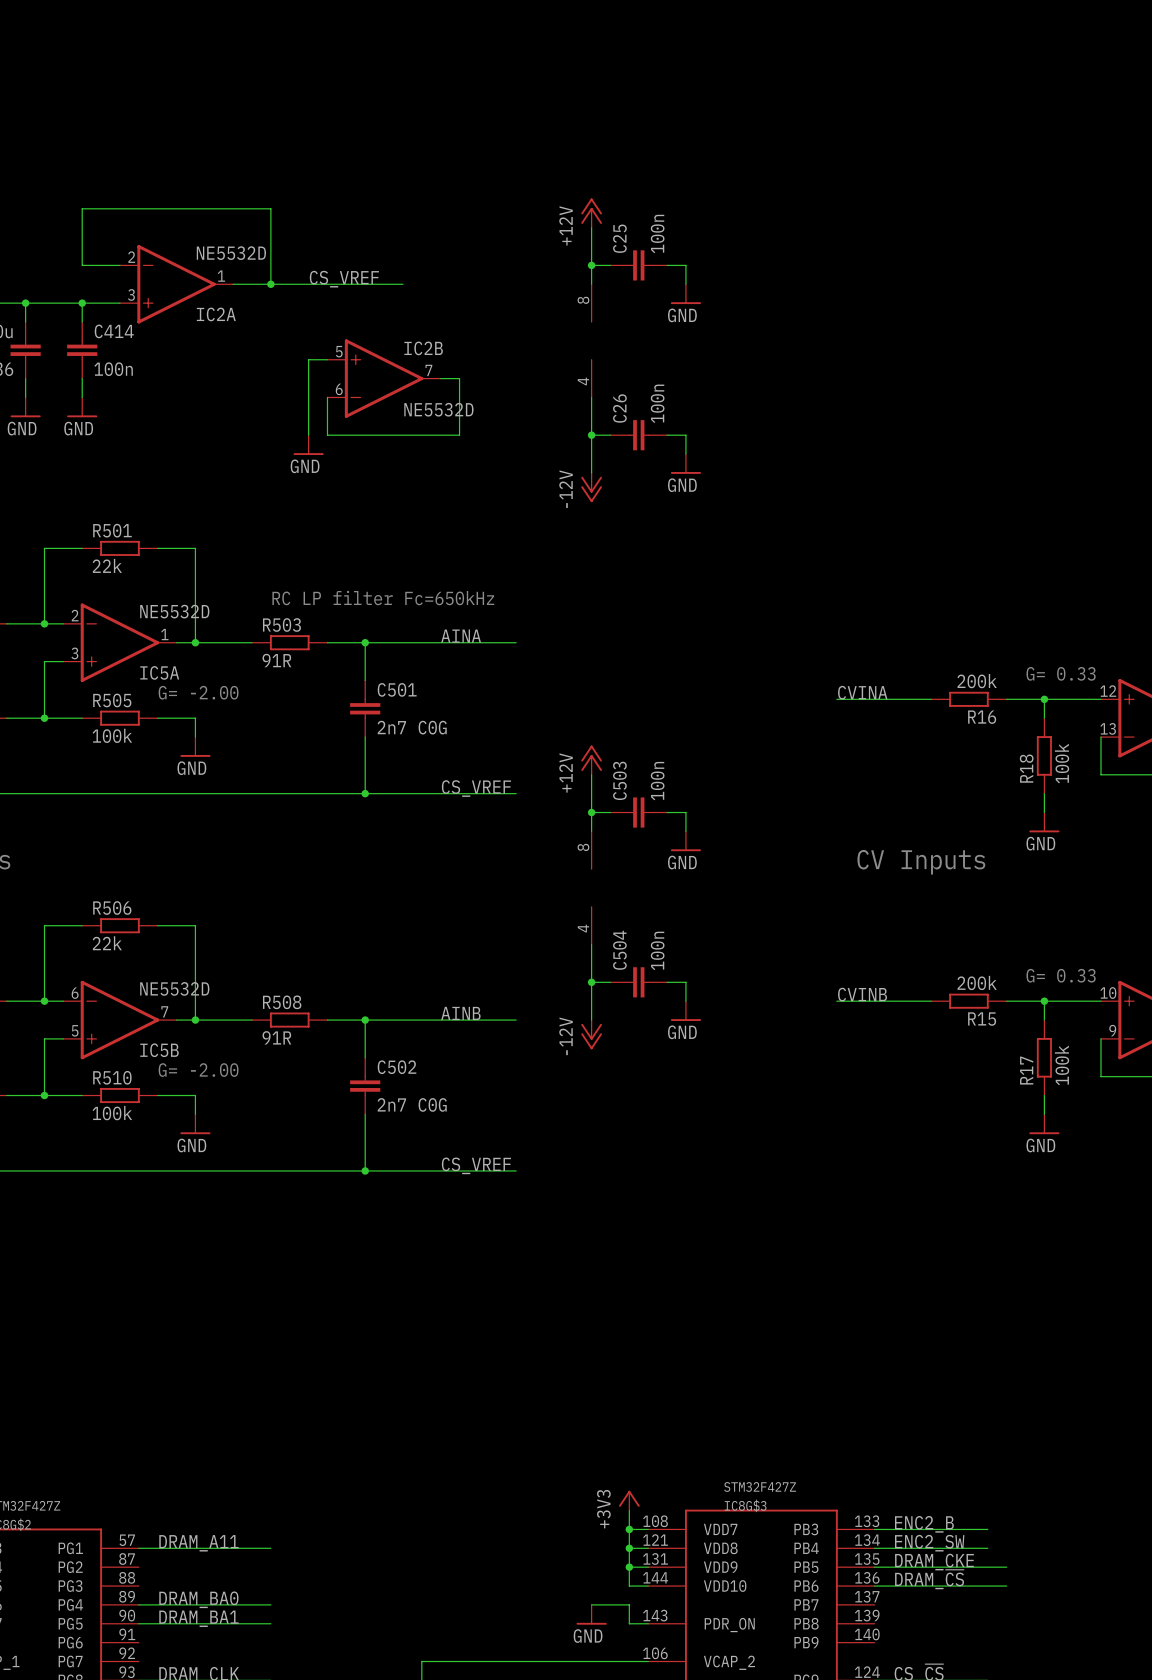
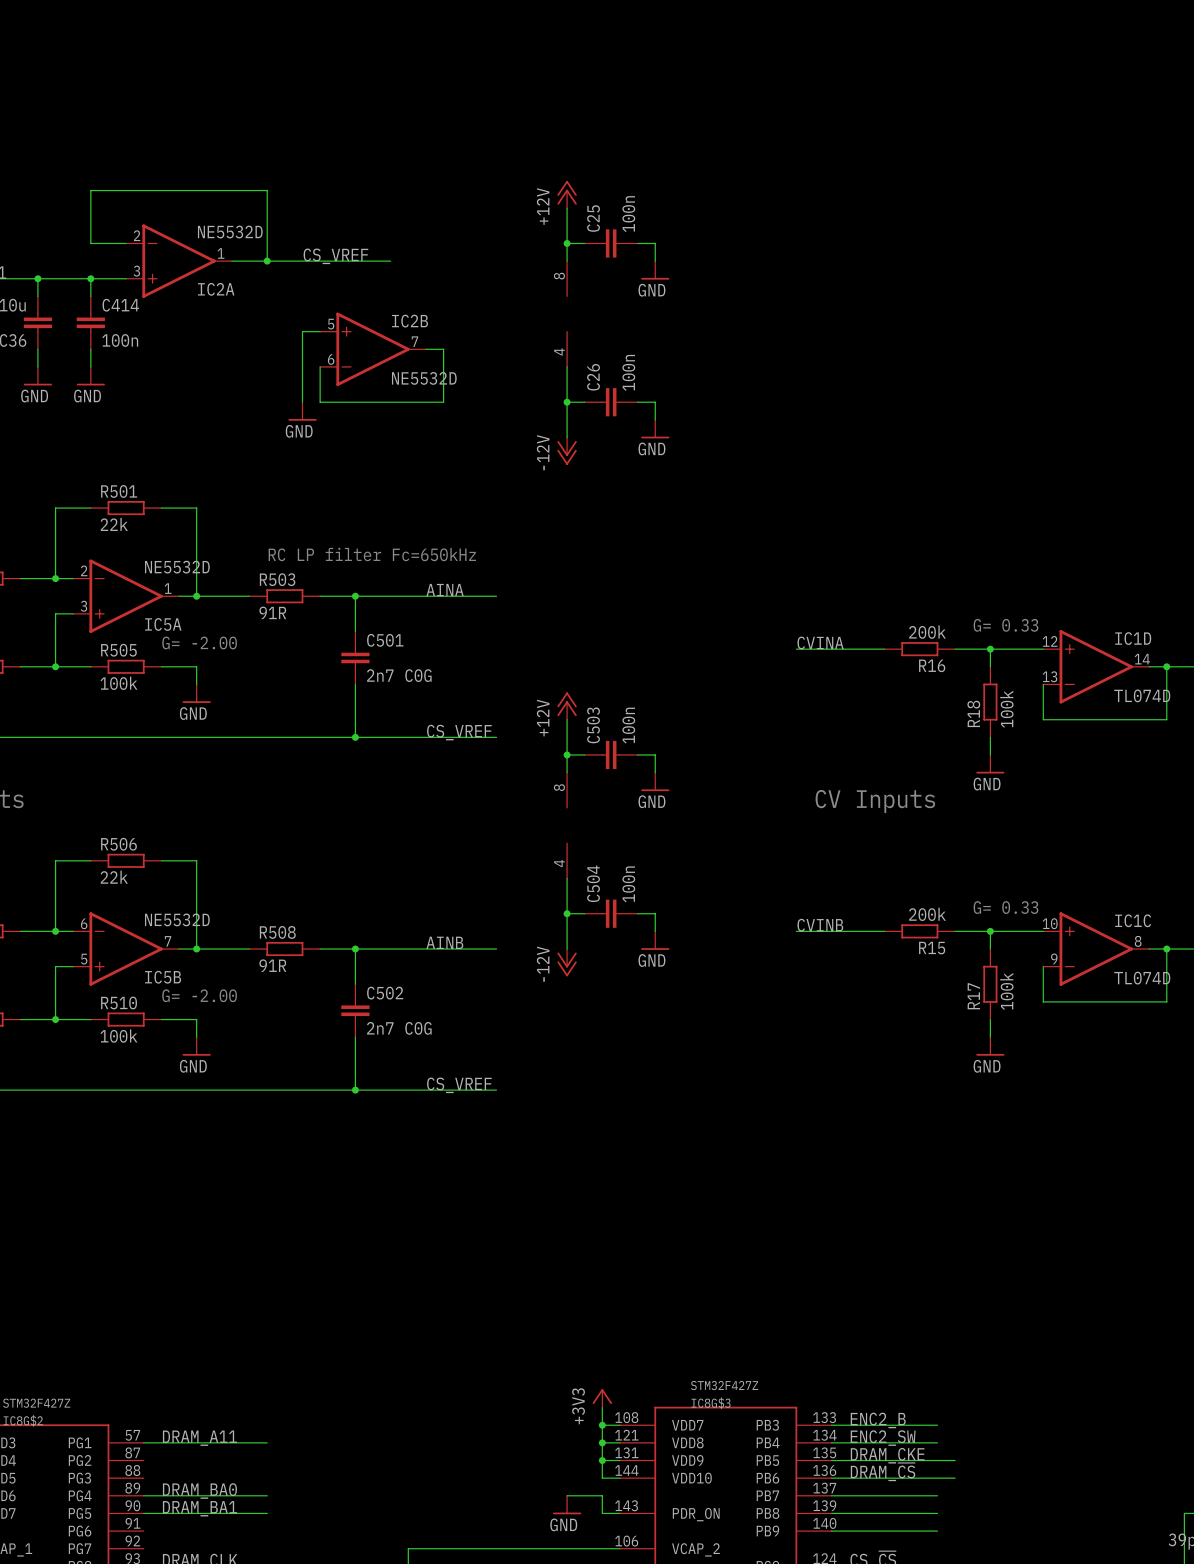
wire: none -> (831, 1495) (937, 1495)
wire: none -> (831, 1513) (937, 1513)
wire: none -> (831, 1531) (937, 1531)

